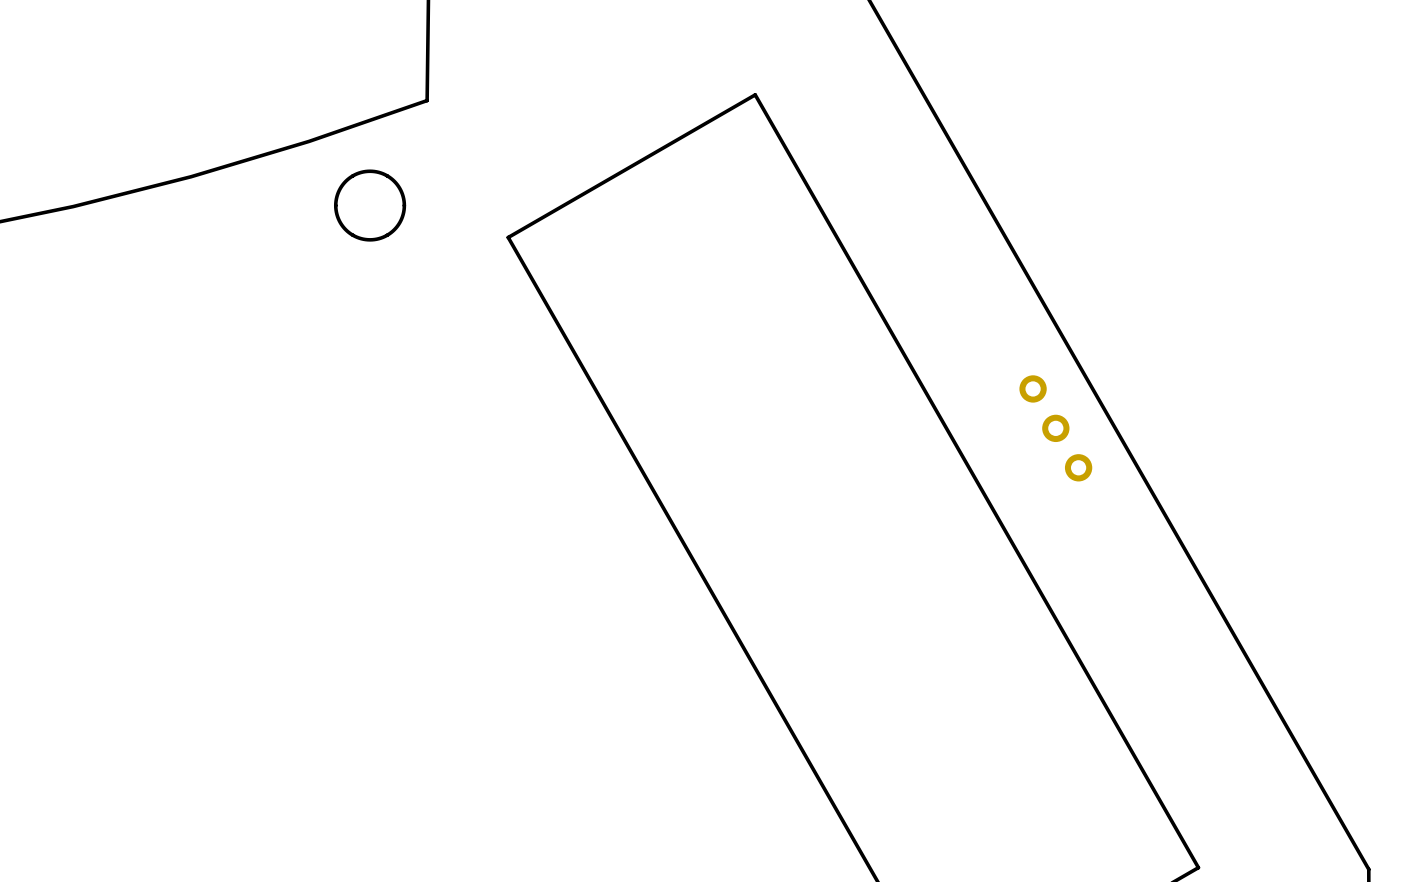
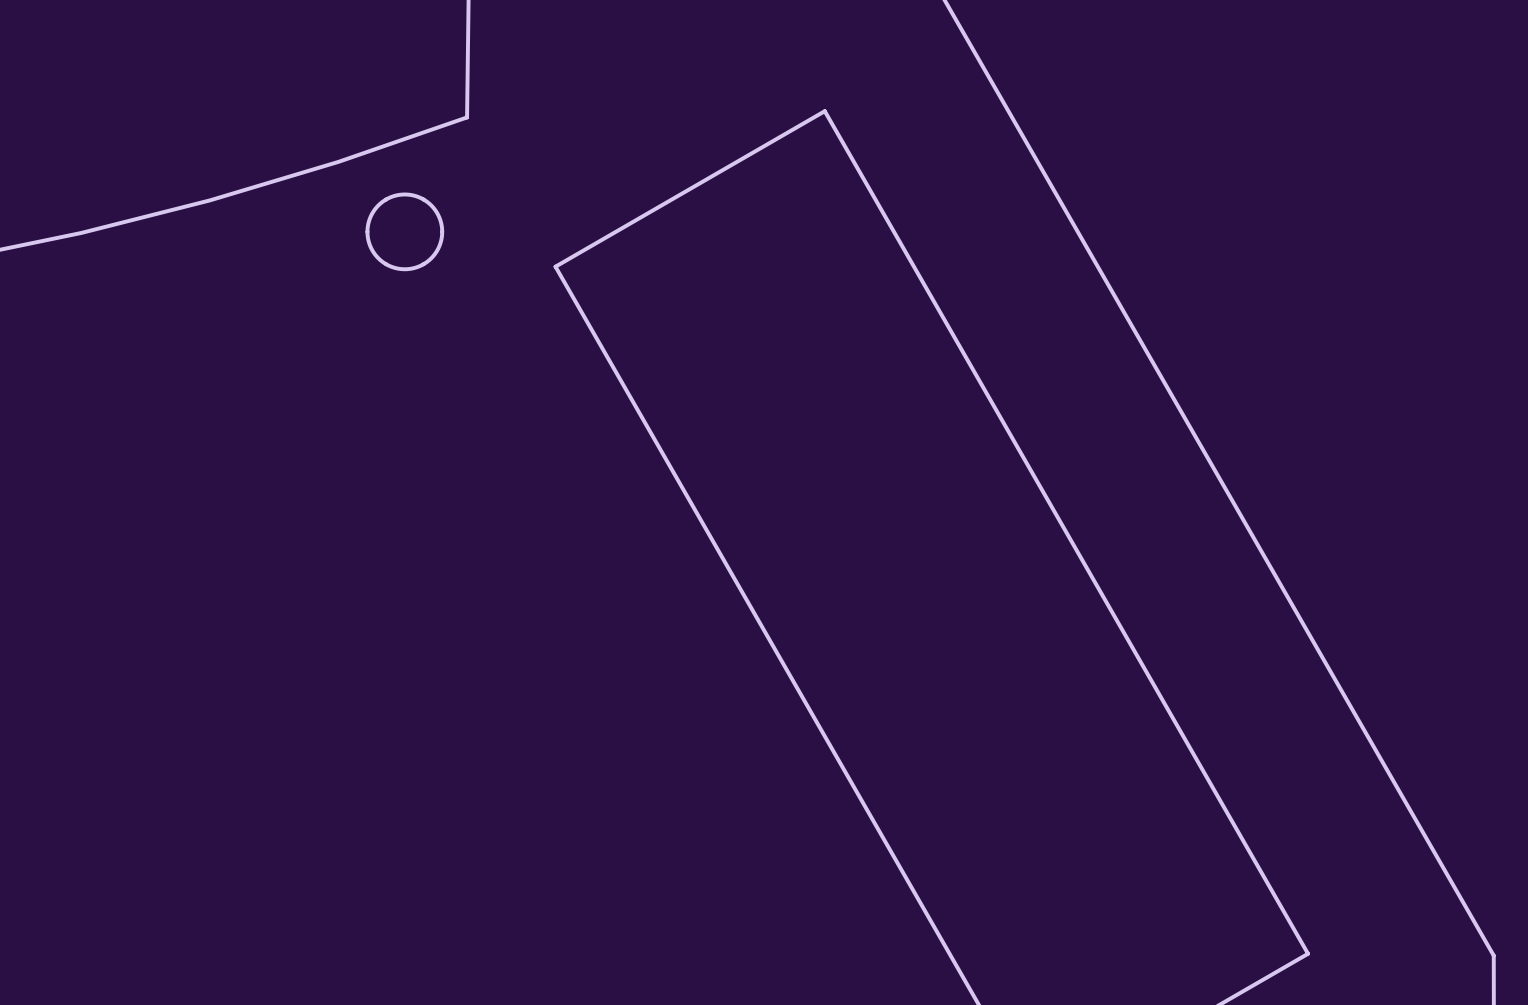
part: (1055, 428) -> none

